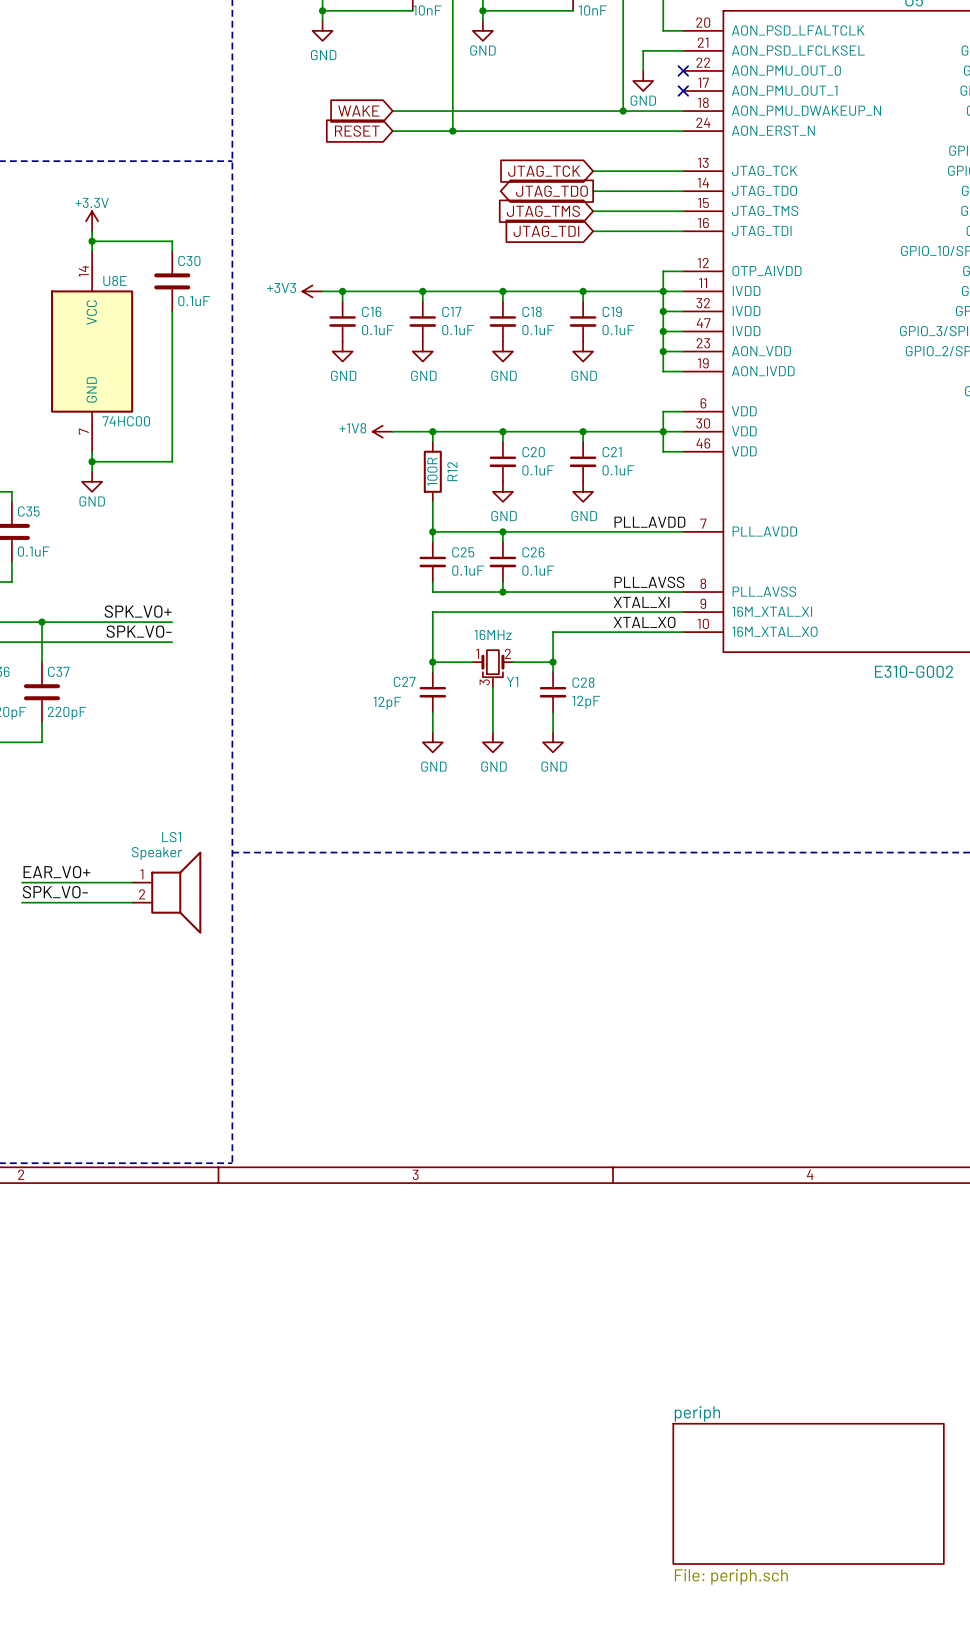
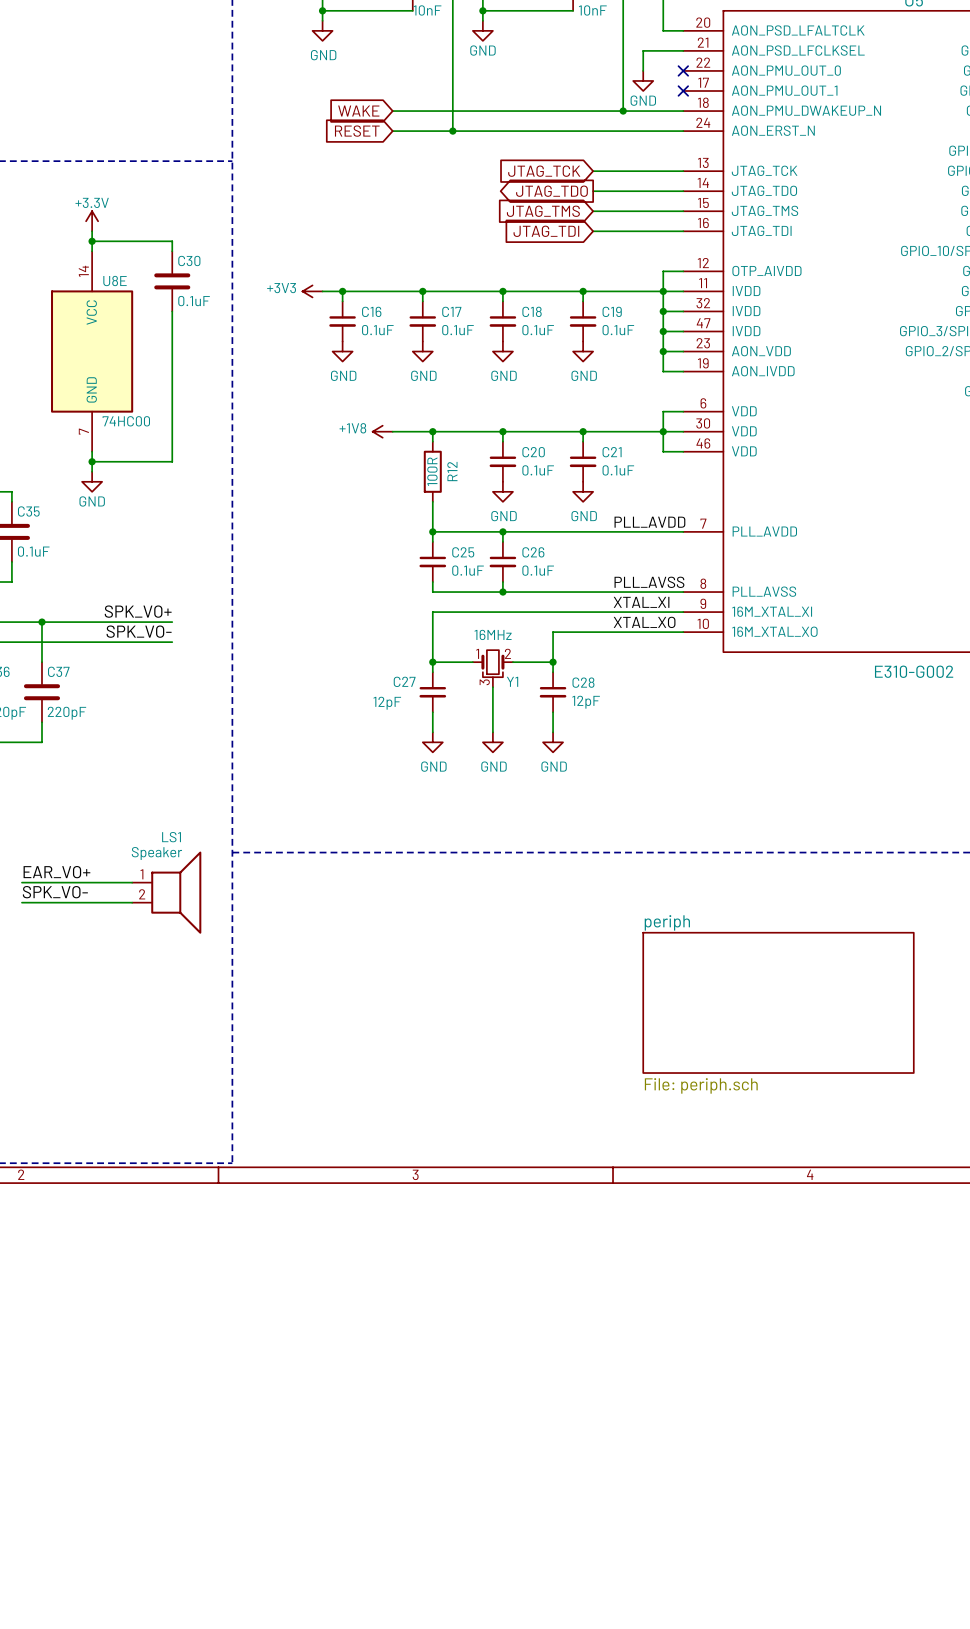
sheet periph: none -> File: periph.sch (778, 1002)
sheet periph: File: periph.sch (808, 1493) -> none

